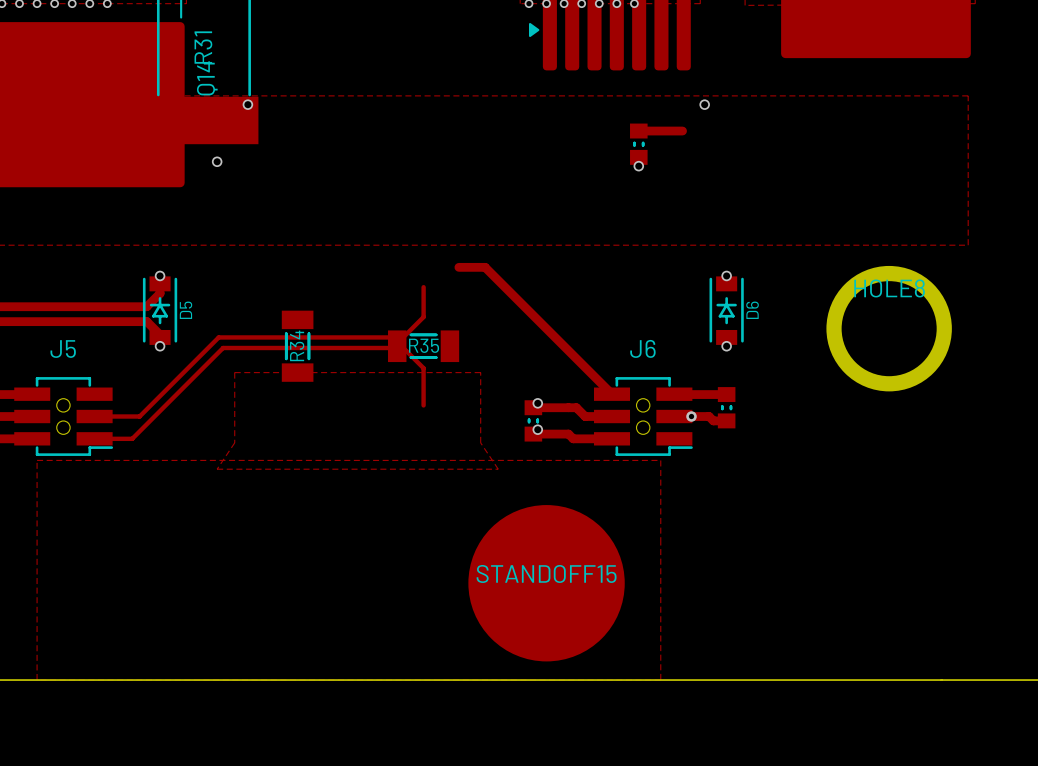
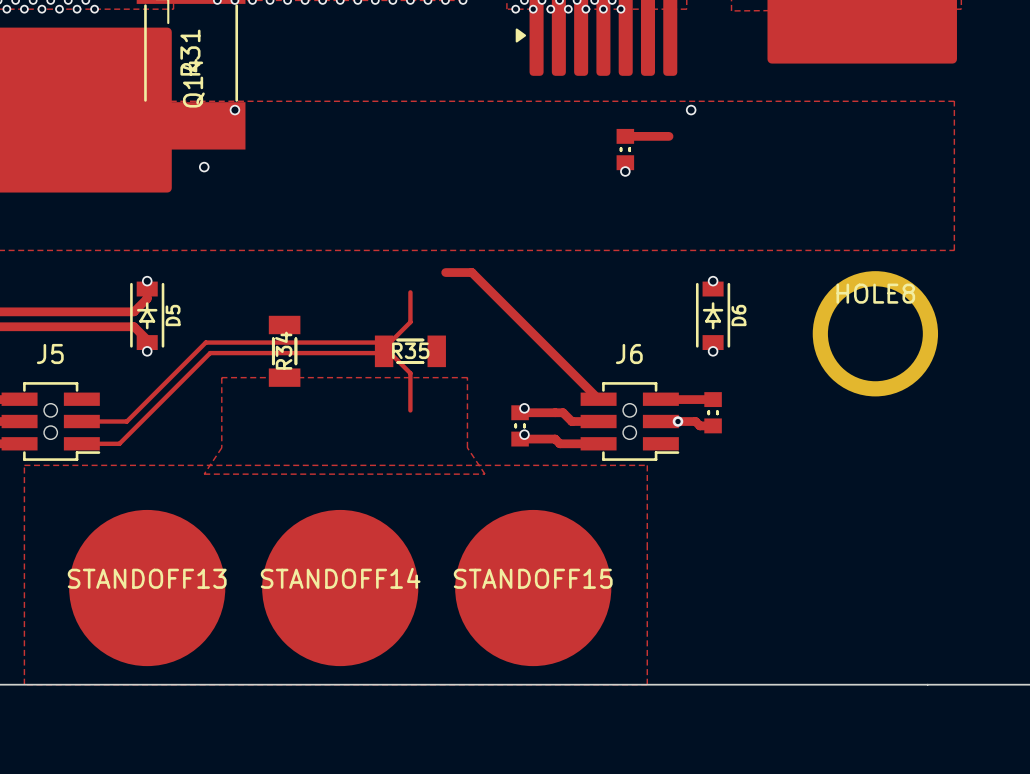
STANDOFF13: none -> (147, 588)
STANDOFF14: none -> (340, 588)

